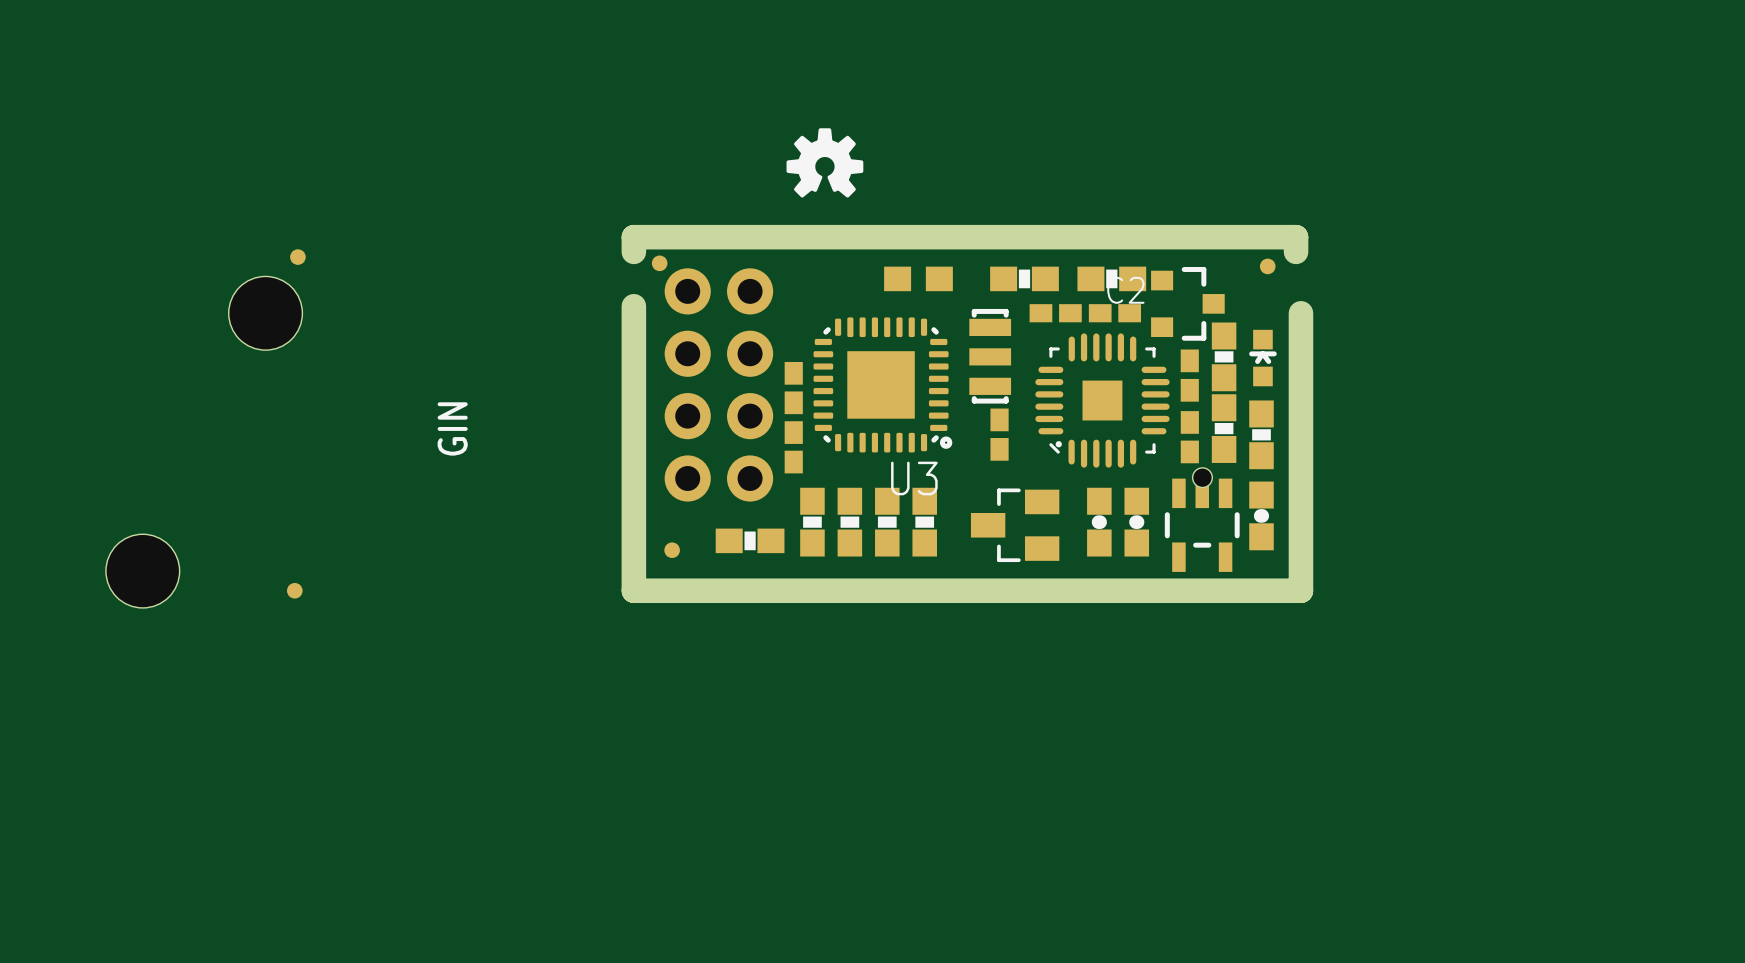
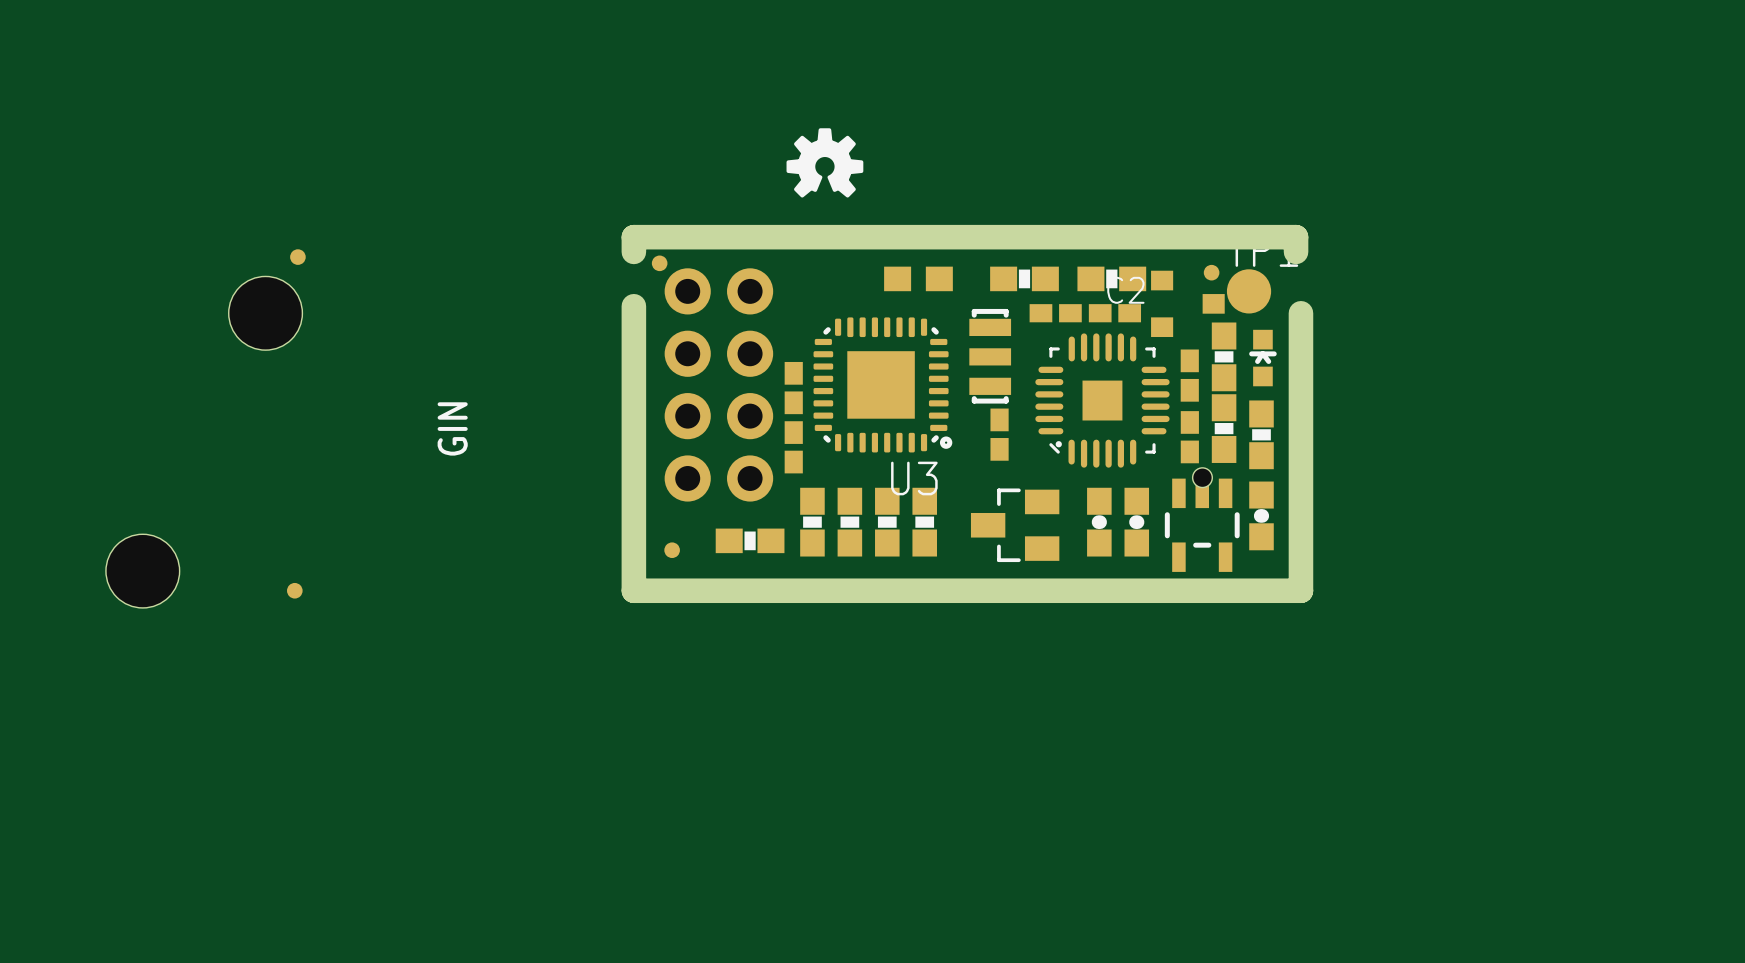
part footprint: [1151, 266, 1225, 341] -> [1151, 270, 1225, 338]
part position: (1267, 266) -> (1211, 272)
part: none -> (1249, 291)

